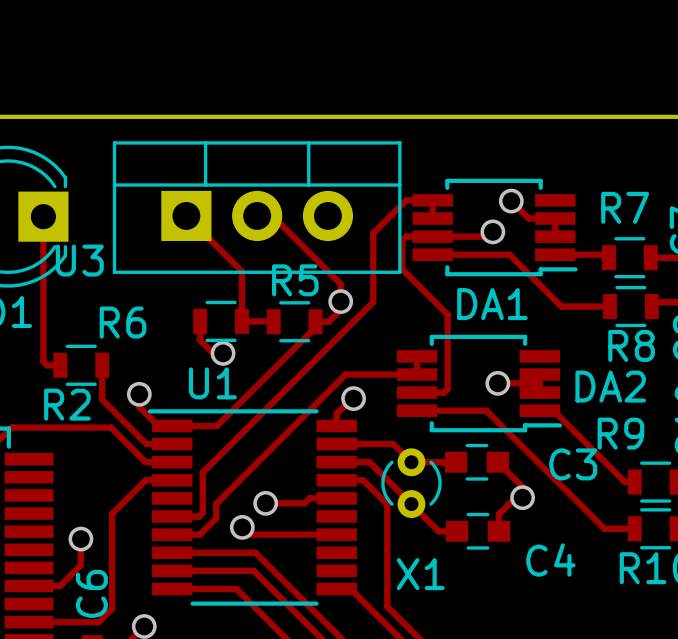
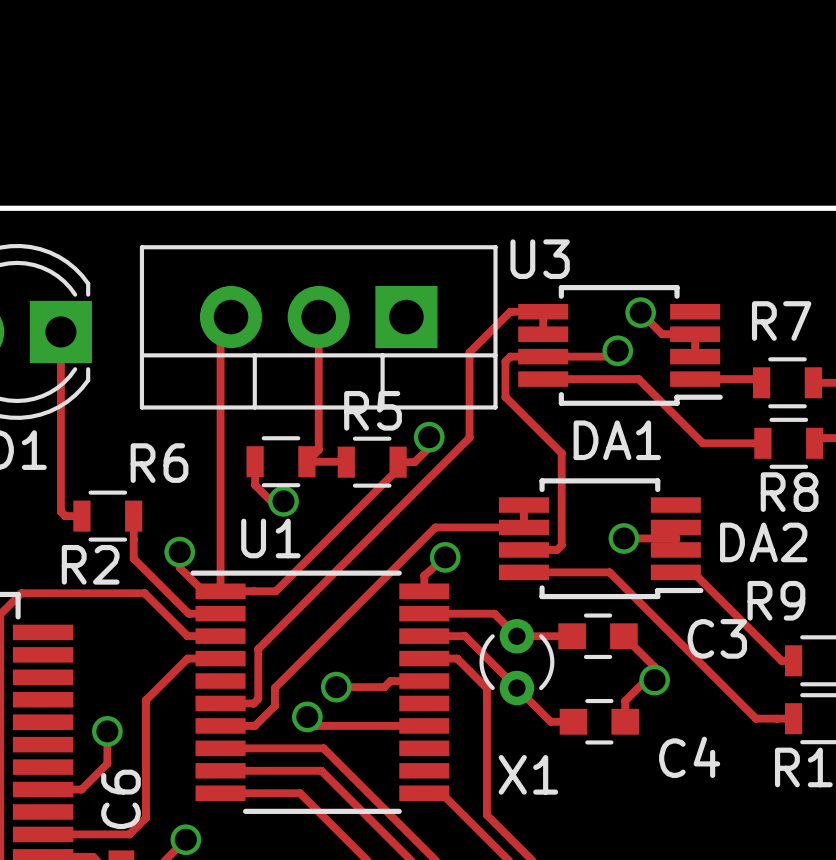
track: none -> (231, 317) (220, 327) (220, 591)
U3 rotation: 0° (257, 207) -> 180° (318, 327)
track: (186, 215) (241, 271) (241, 321) -> (318, 317) (318, 449) (306, 461)
track: (257, 215) (272, 215) (340, 284) (340, 301) -> none

